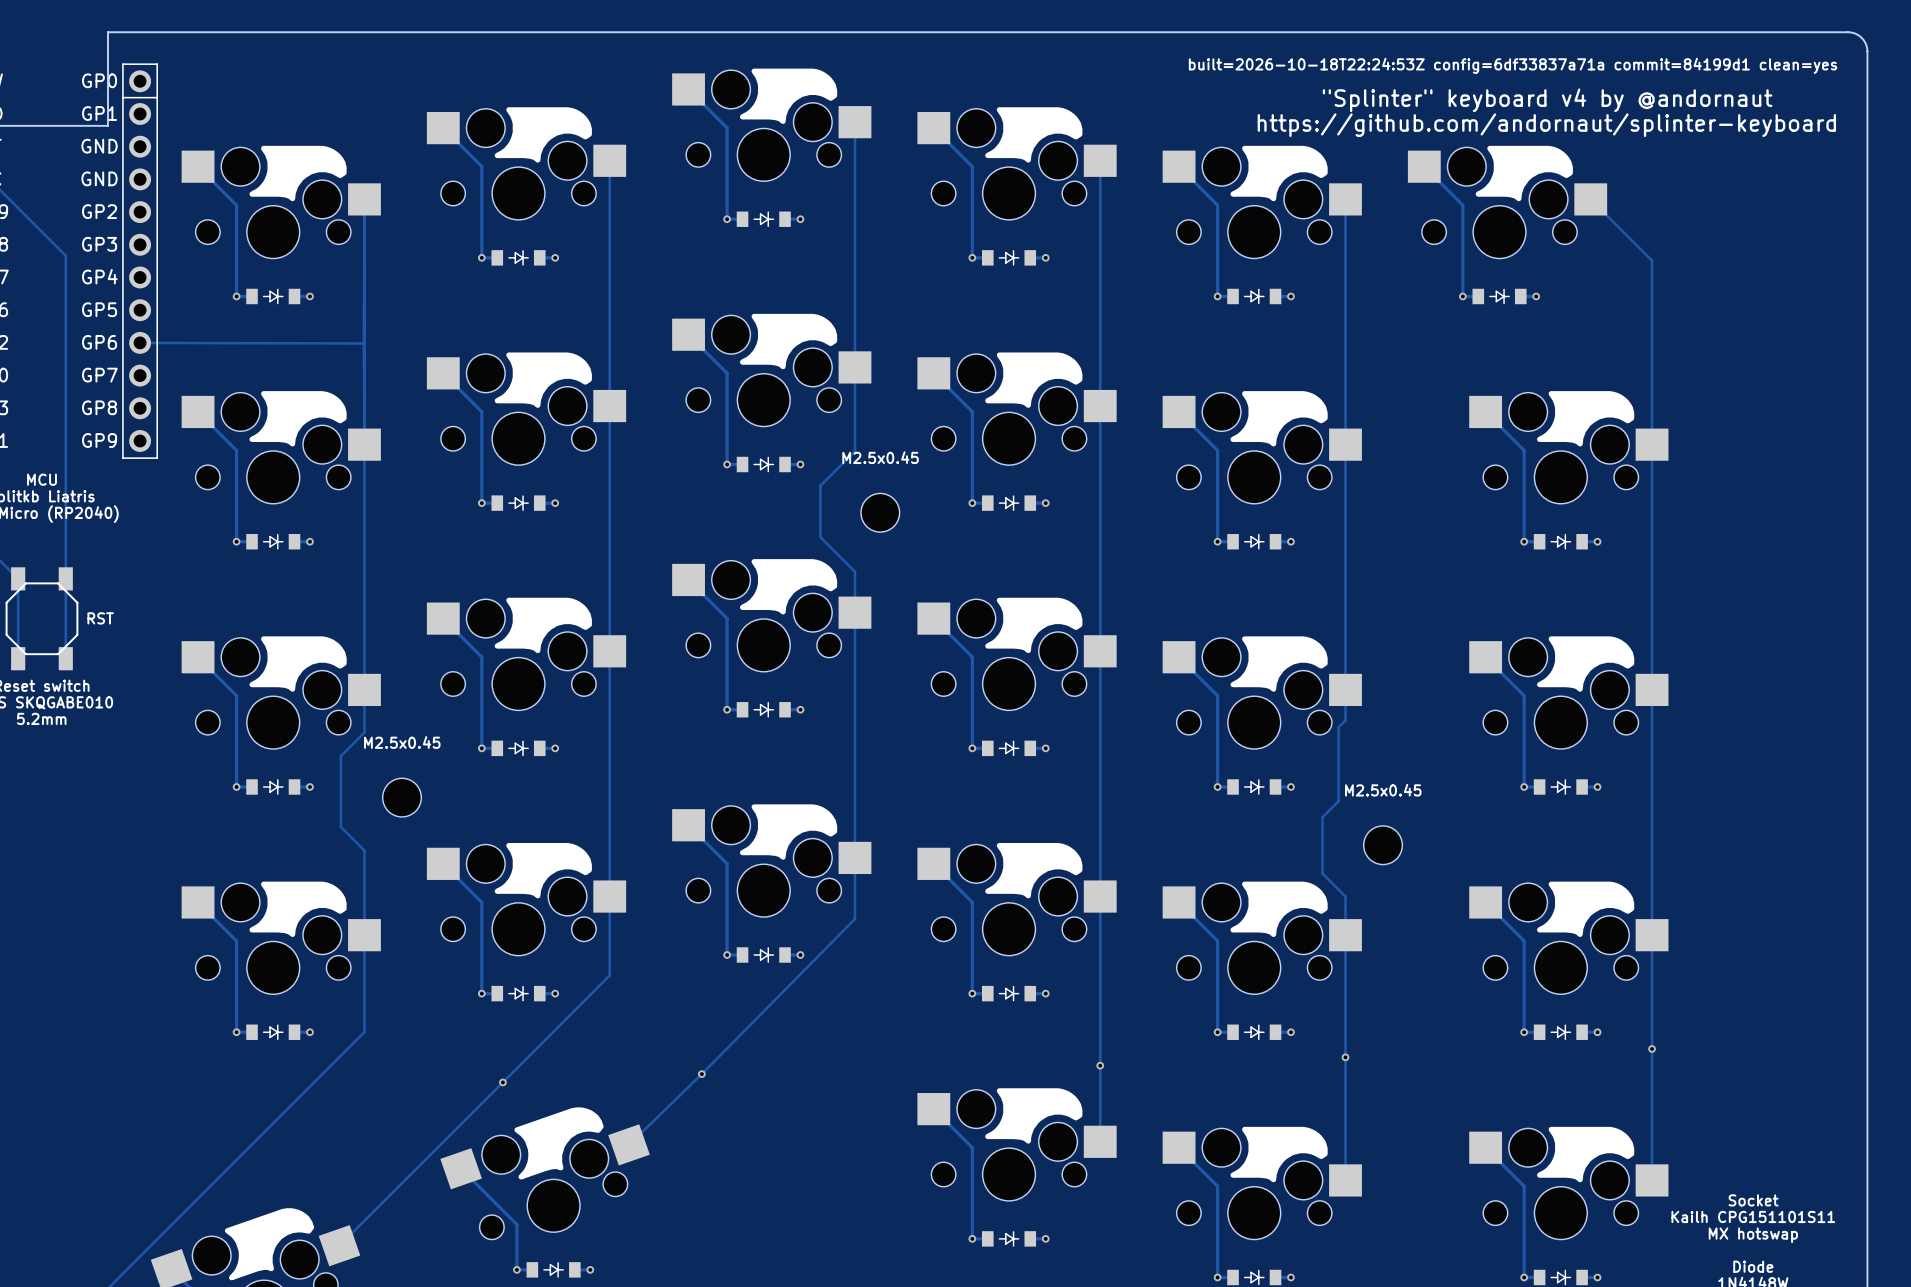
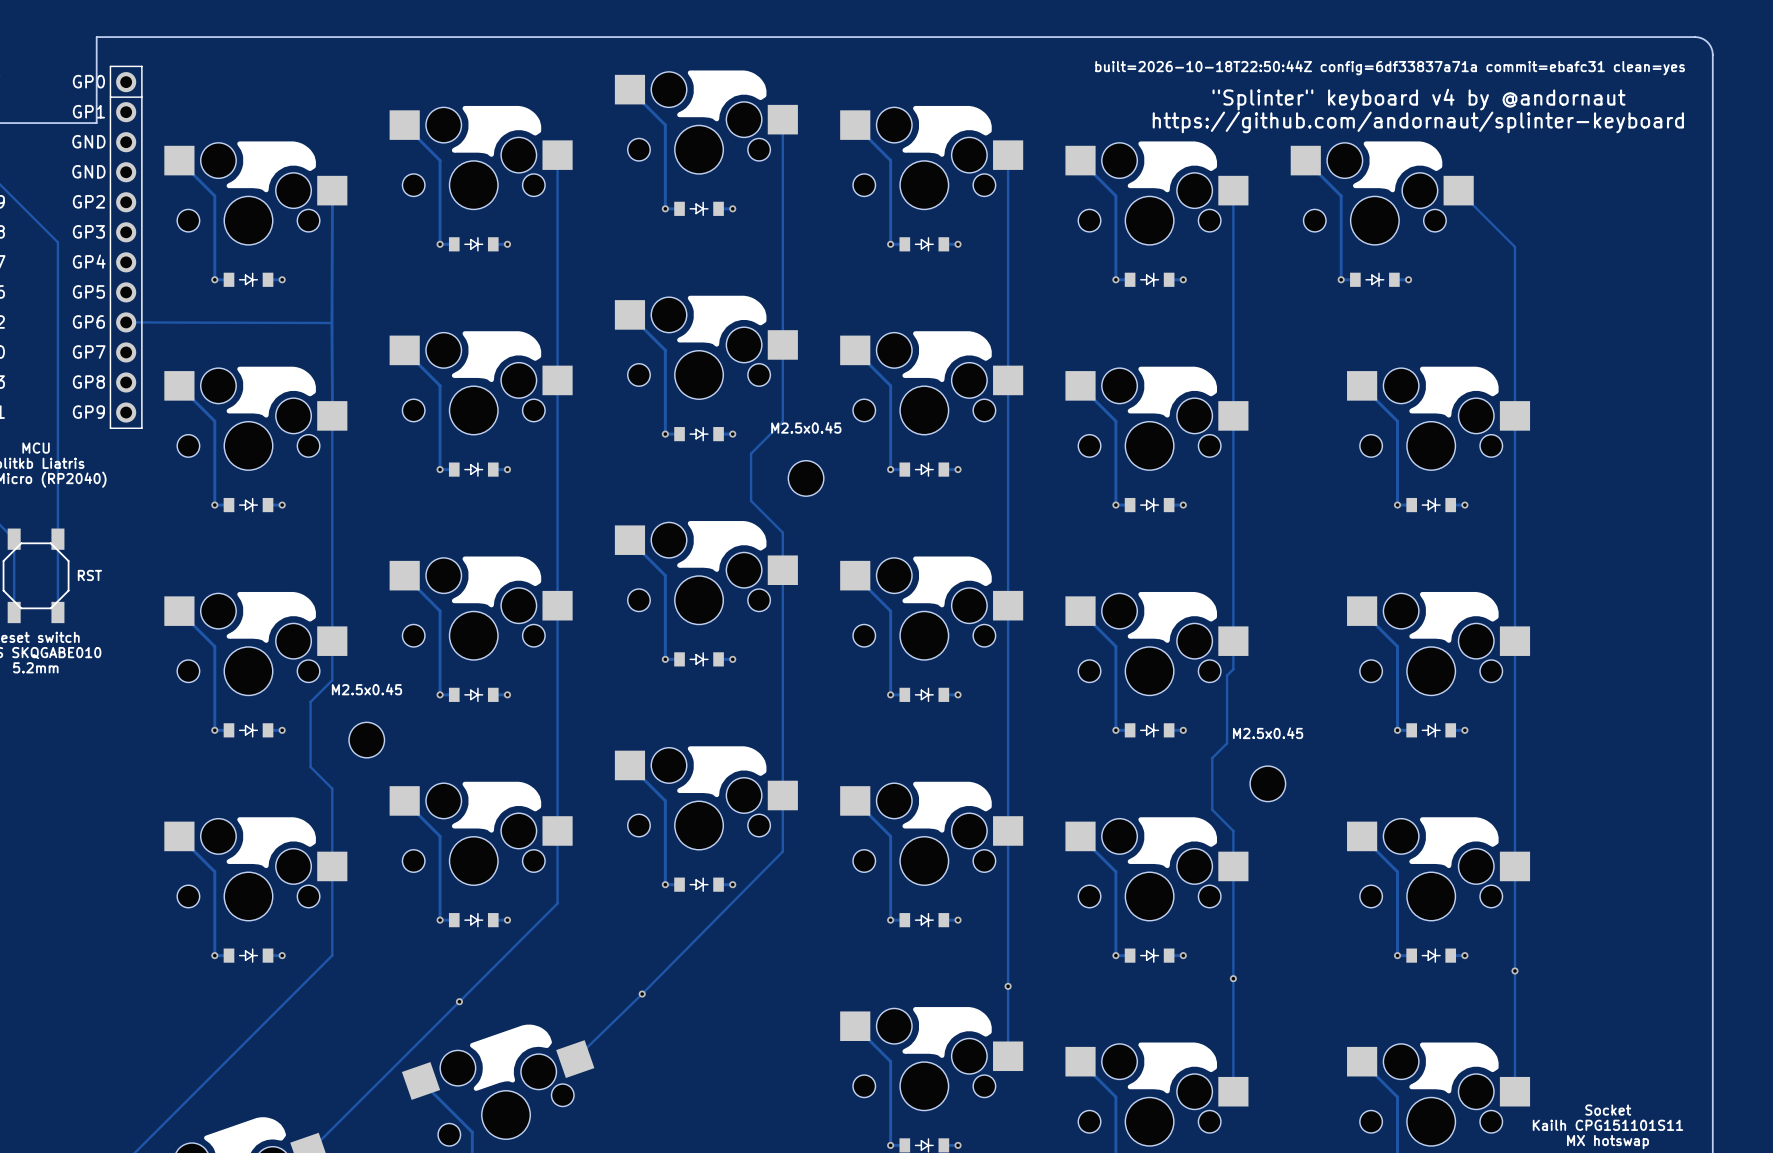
text: built=2026-10-18T22:24:53Z config=6df33837a71a commit=84199d1 clean=yes (1513, 65) -> built=2026-10-18T22:50:44Z config=6df33837a71a commit=ebafc31 clean=yes (1390, 67)

